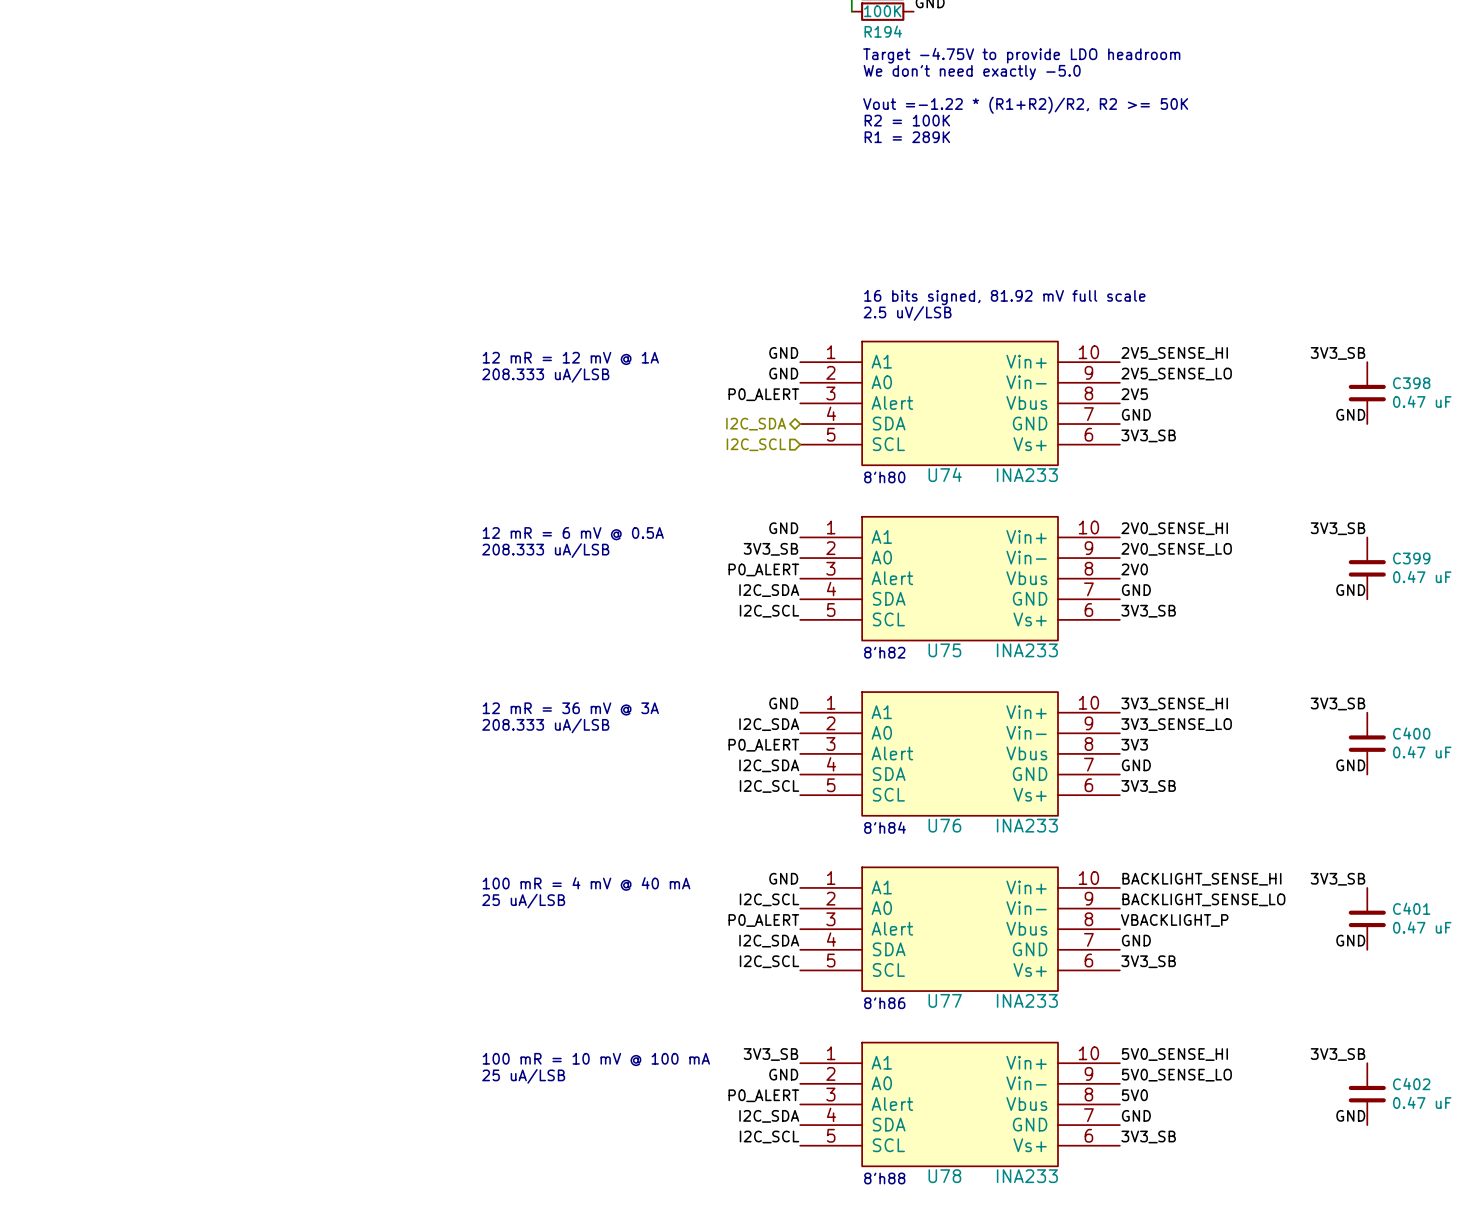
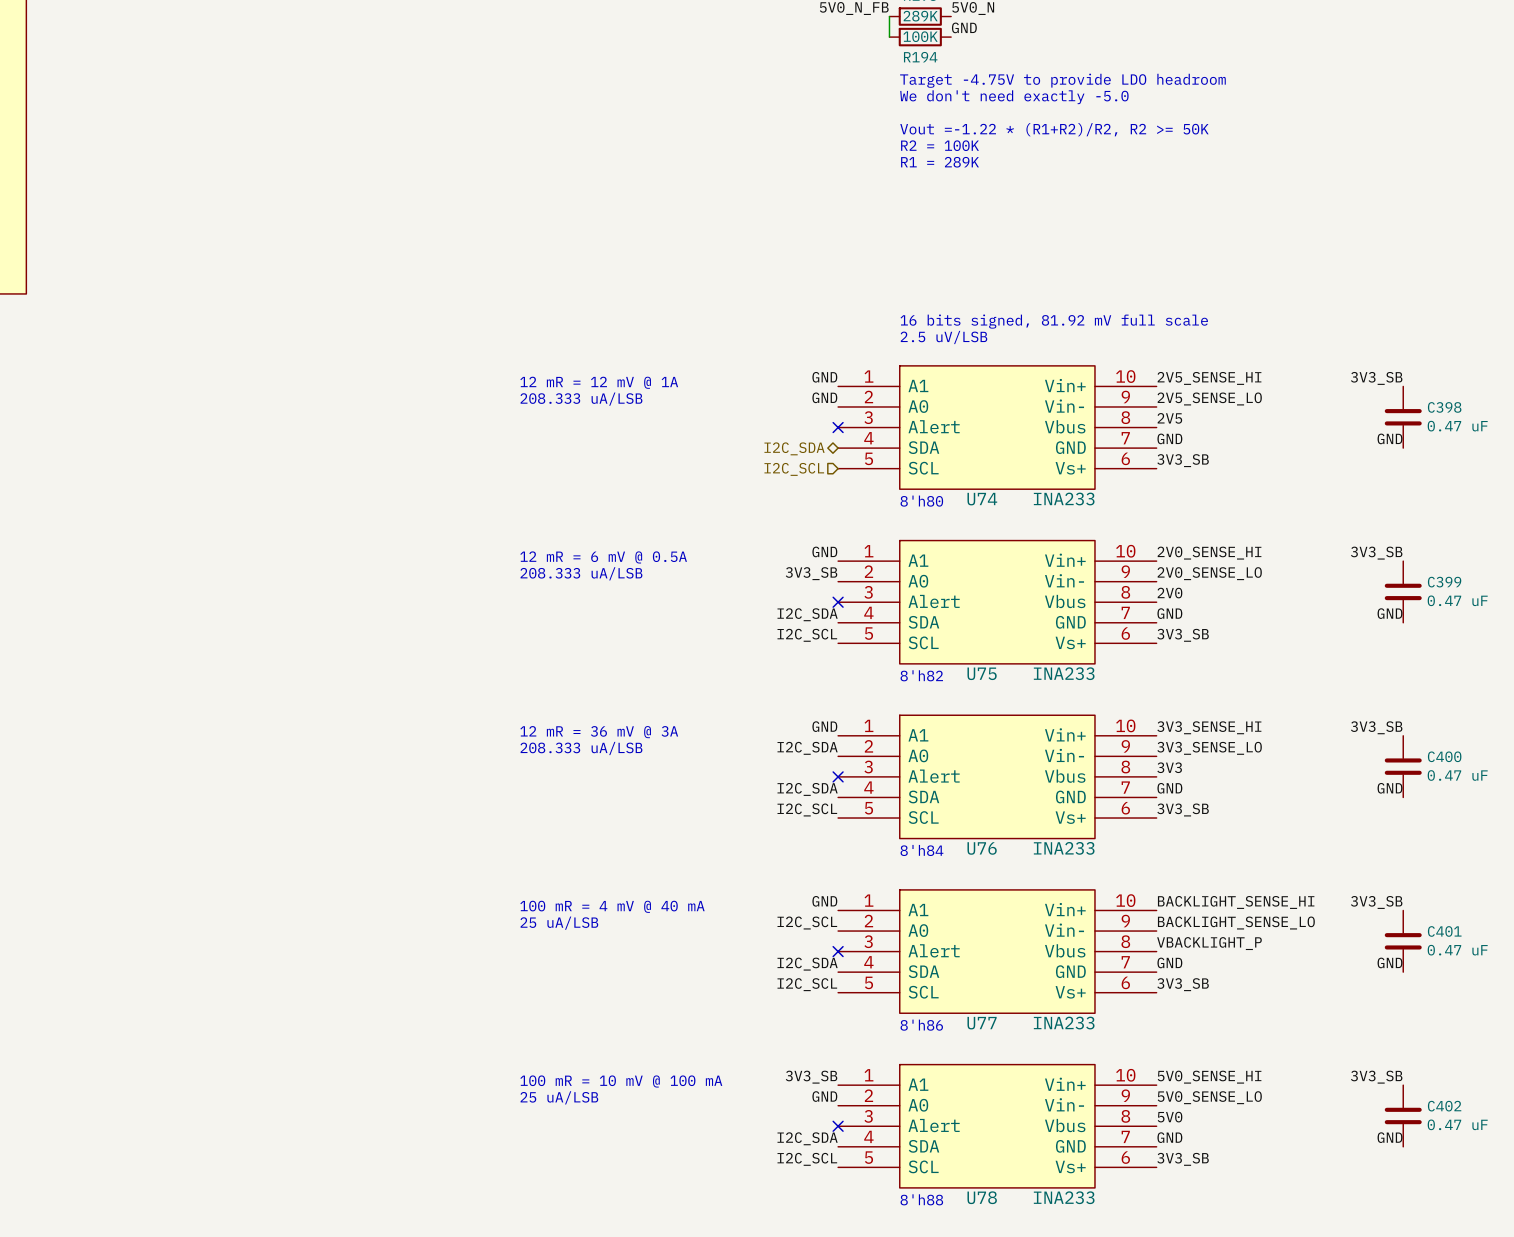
label: P0_ALERT (763, 394) -> none
no-connect mark: none -> (838, 427)
label: P0_ALERT (763, 569) -> none
no-connect mark: none -> (838, 602)
label: P0_ALERT (763, 745) -> none
no-connect mark: none -> (838, 776)
label: P0_ALERT (763, 920) -> none
no-connect mark: none -> (838, 951)
label: P0_ALERT (763, 1095) -> none
no-connect mark: none -> (838, 1126)

